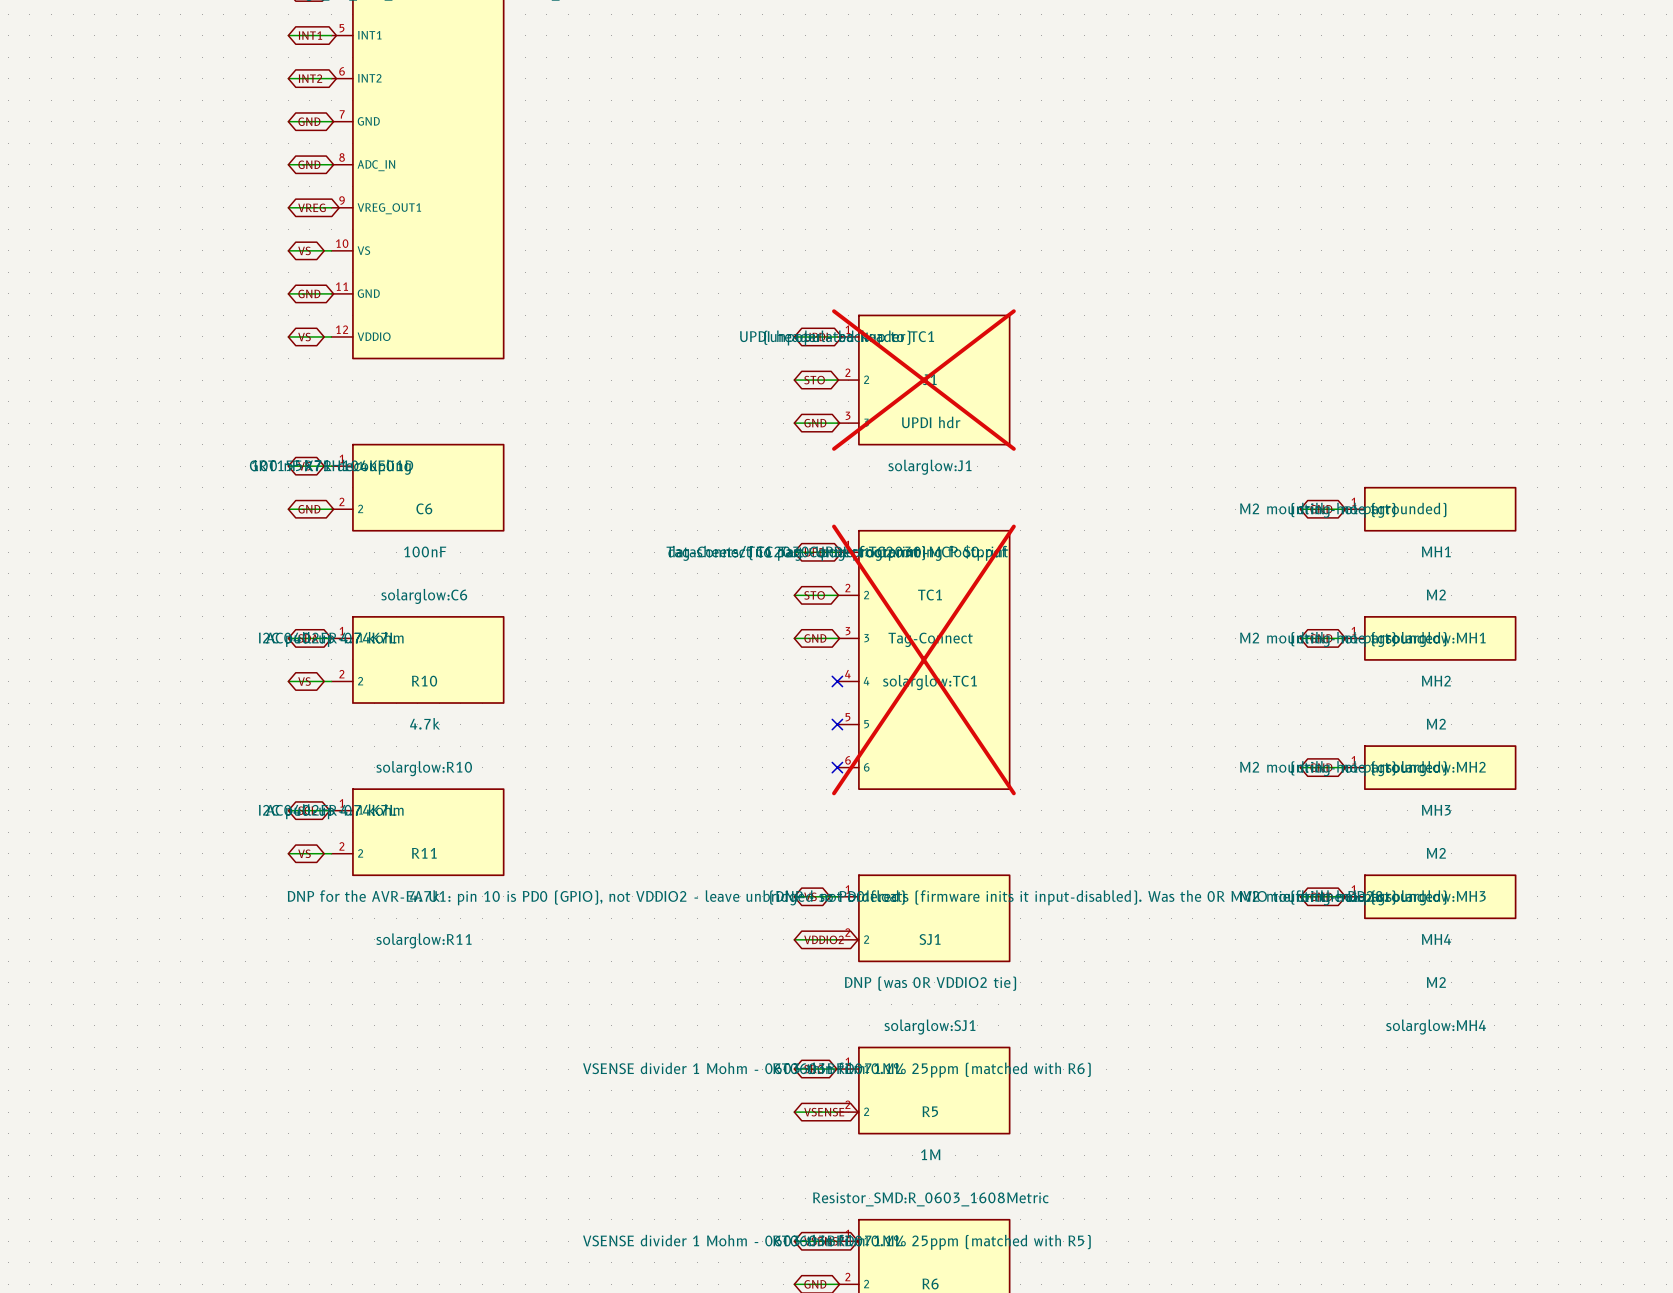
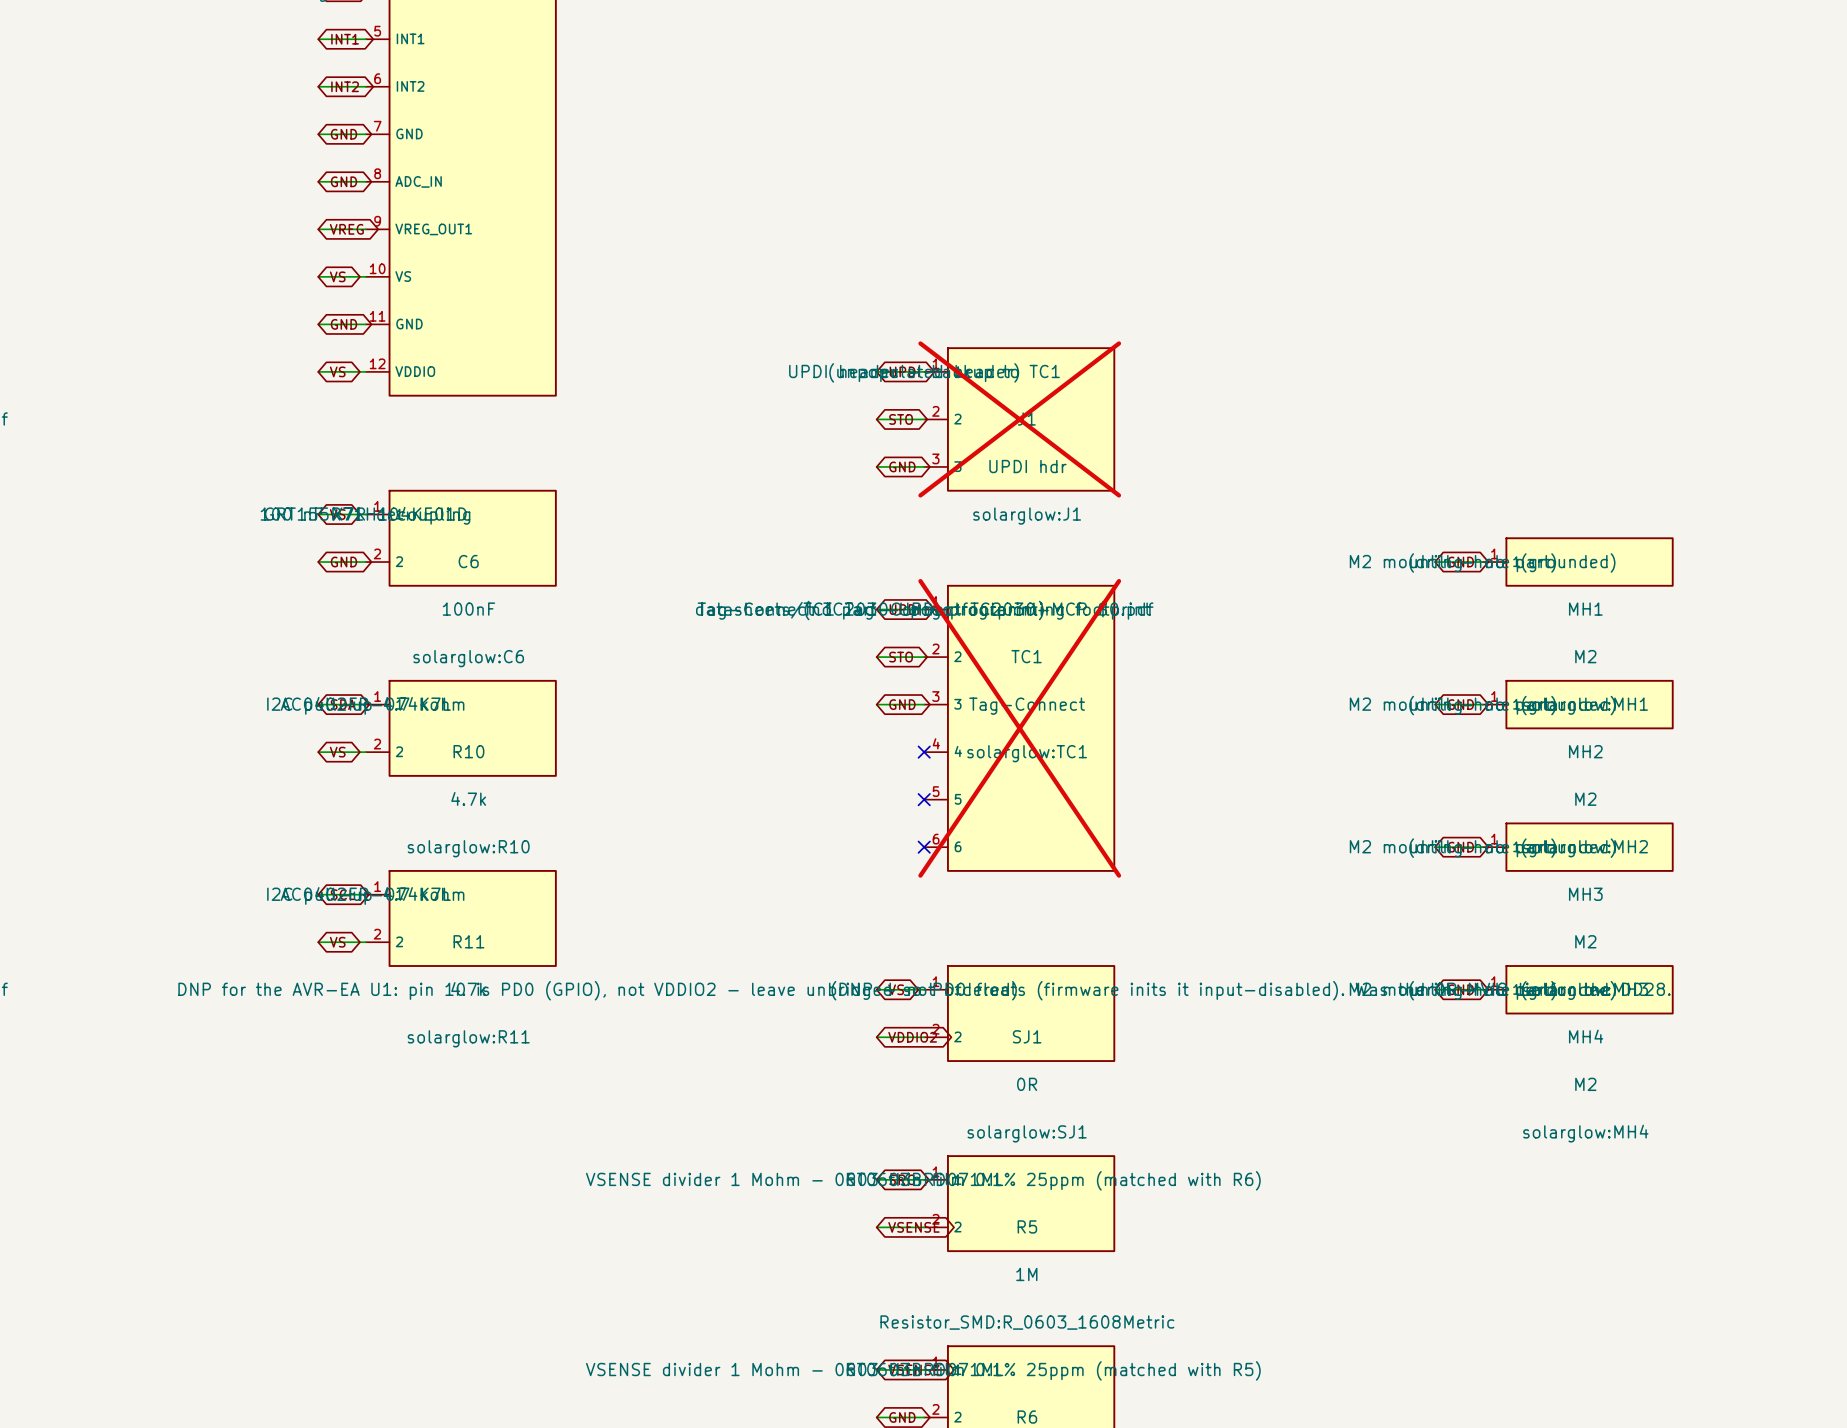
SJ1 value: DNP (was 0R VDDIO2 tie) (930, 983) -> 0R (1027, 1084)

